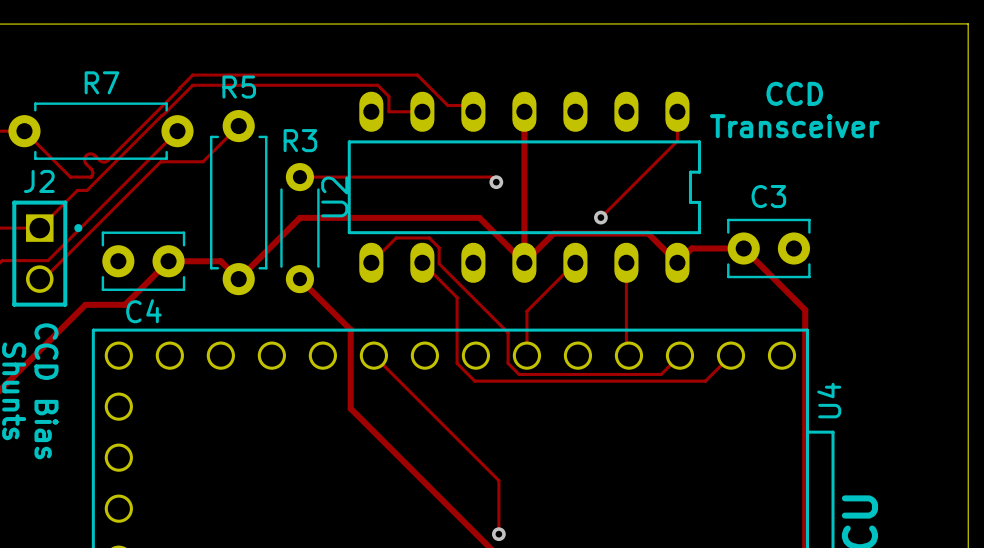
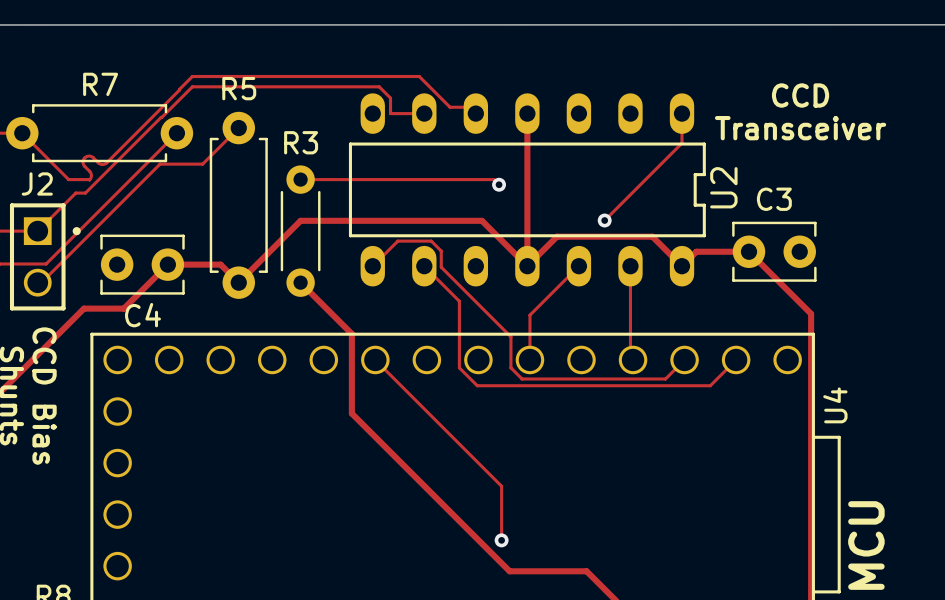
U2 name position: U2 (334, 196) -> U2 (723, 187)

